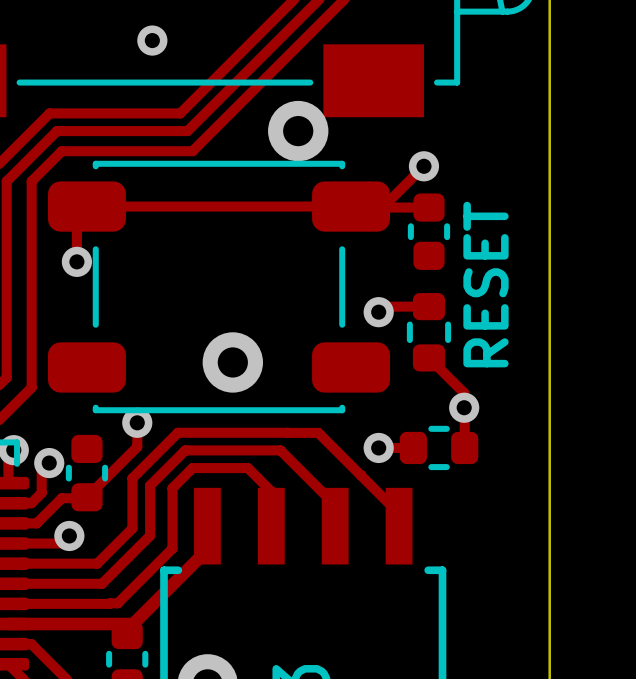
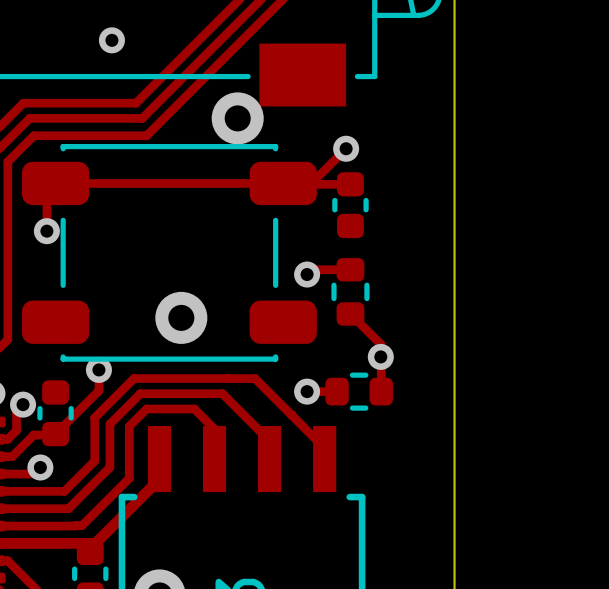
text: RESET (485, 284) -> none

